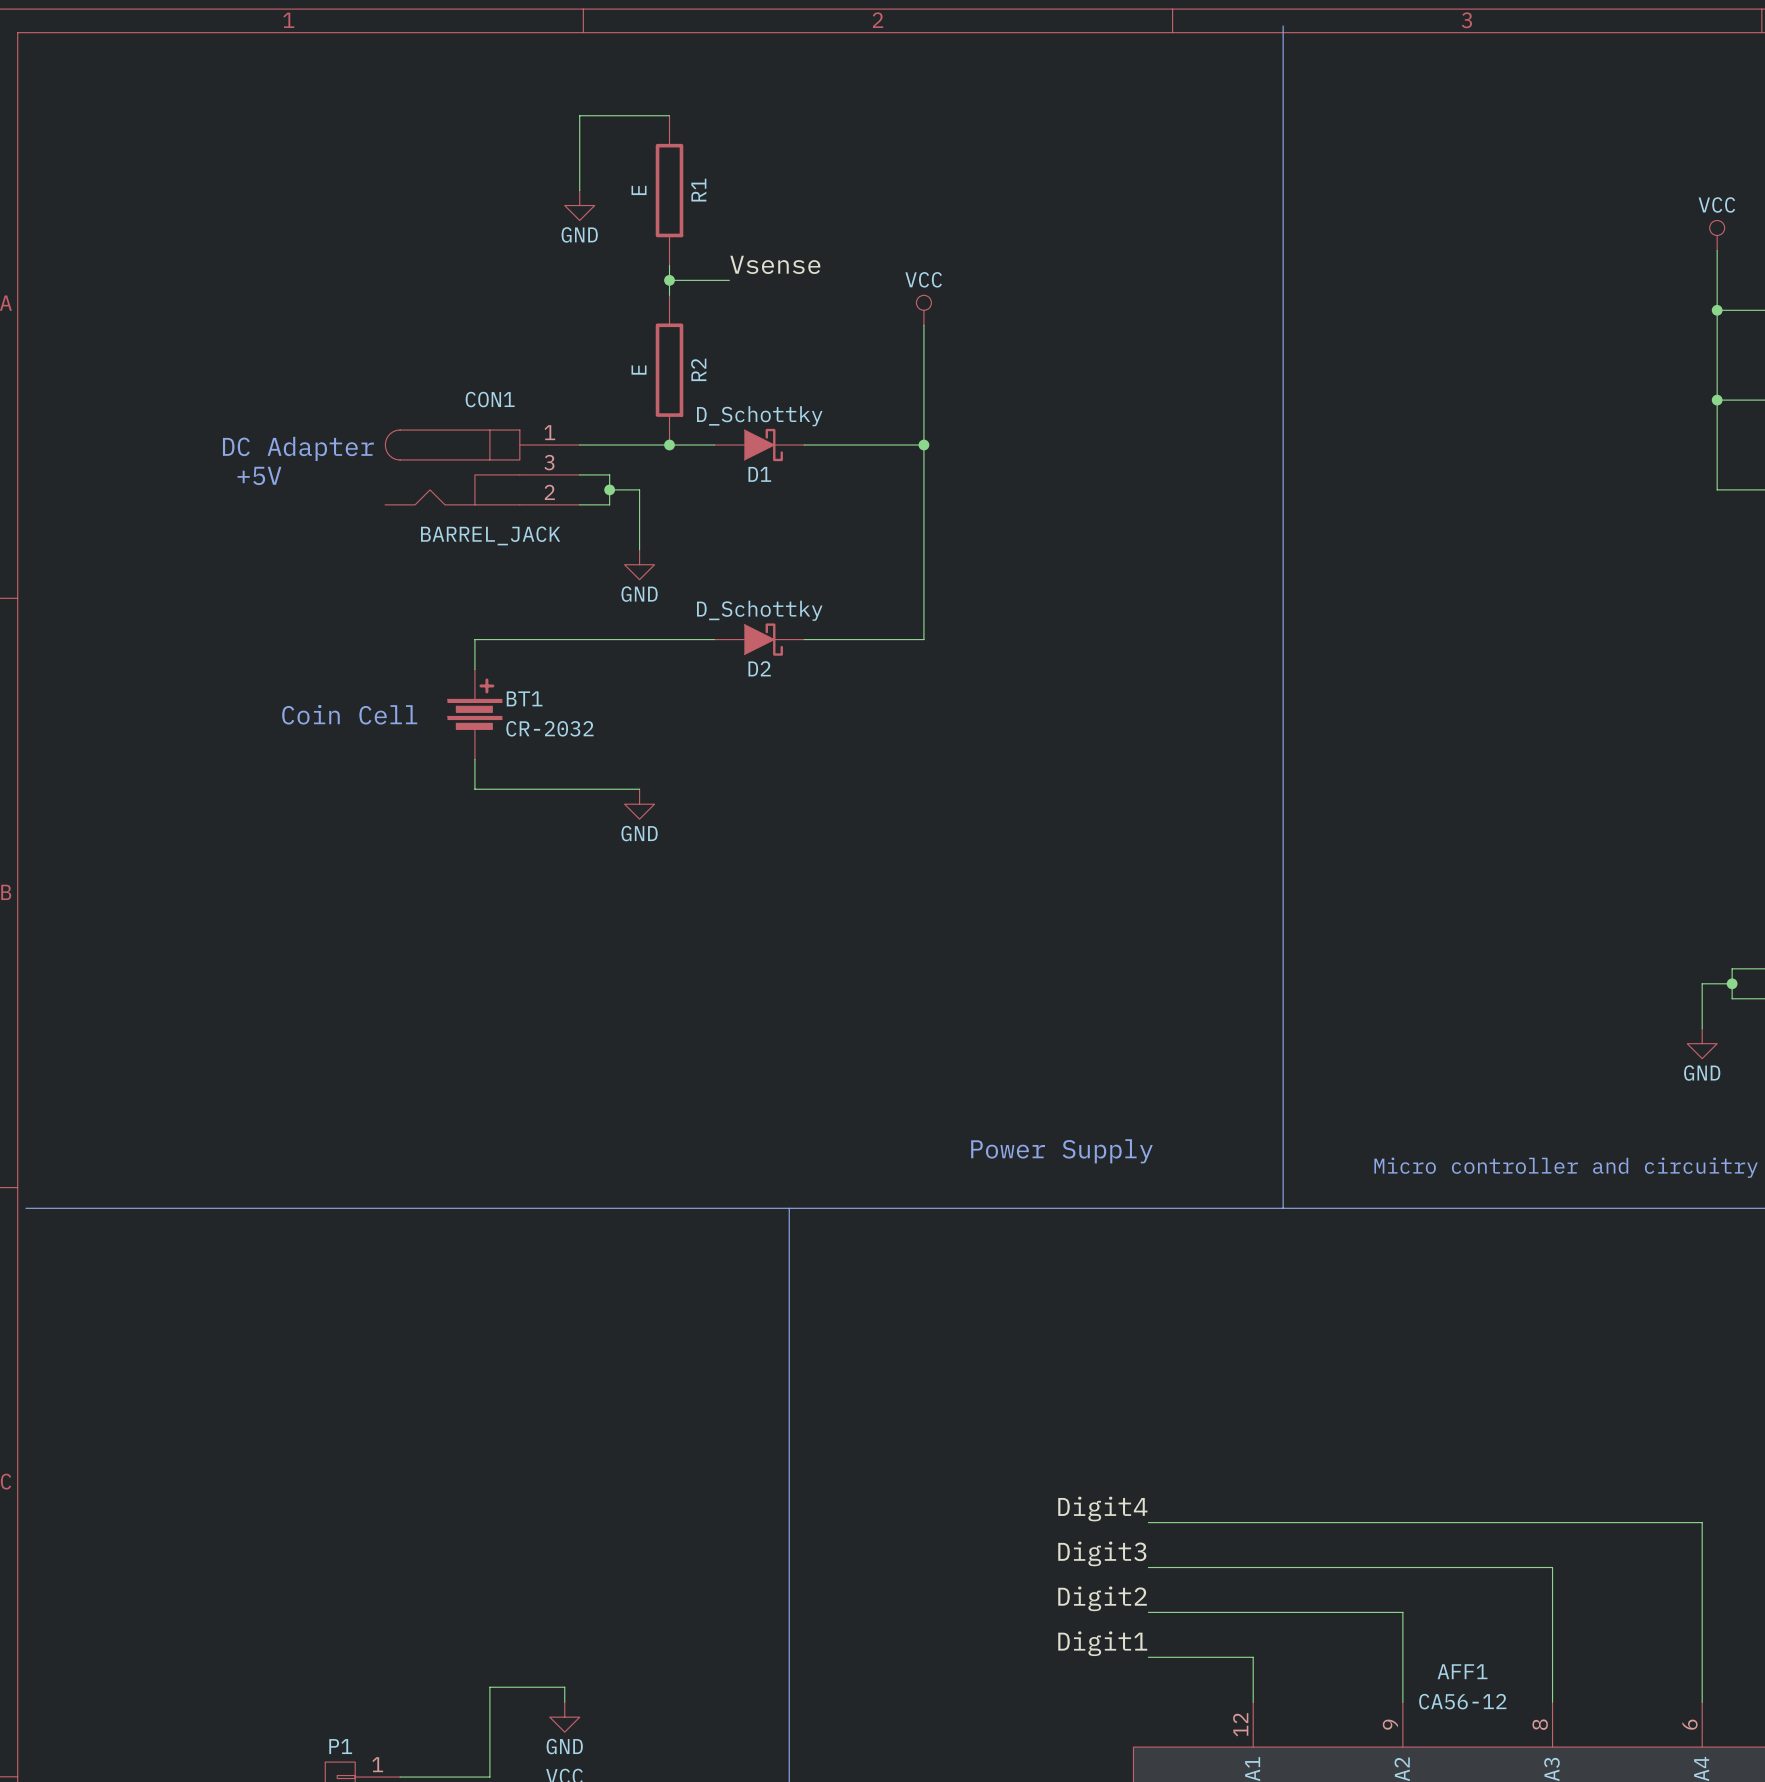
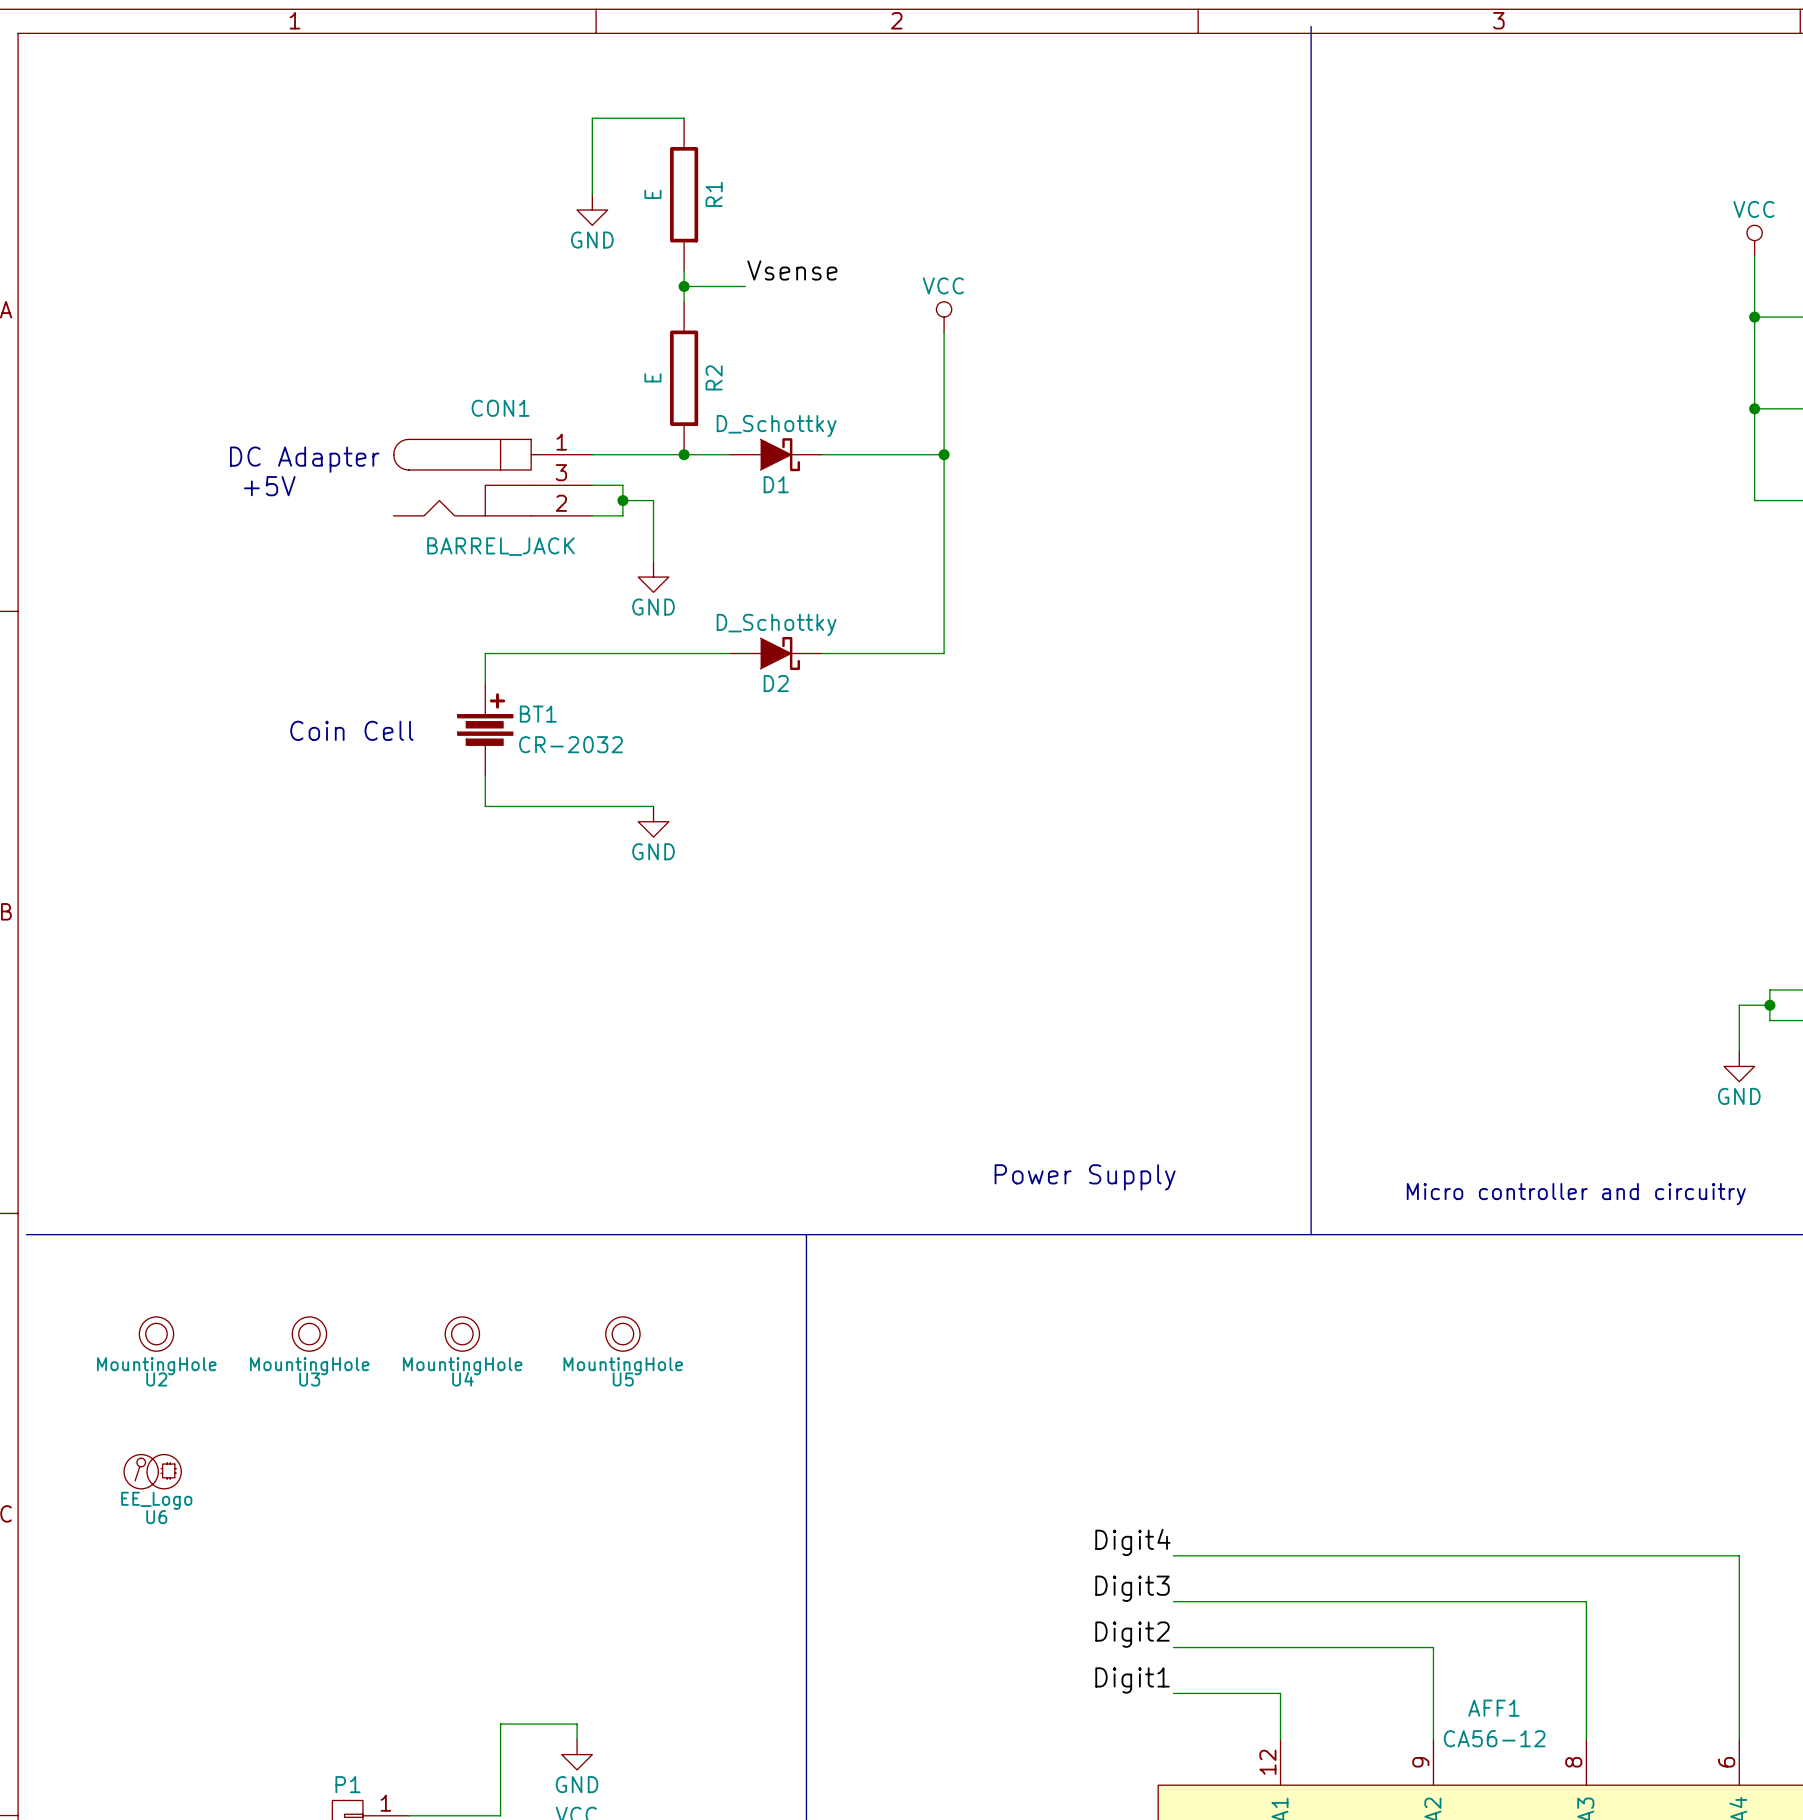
U2: none -> MountingHole (156, 1334)
U3: none -> MountingHole (309, 1334)
U4: none -> MountingHole (462, 1334)
U5: none -> MountingHole (622, 1334)
U6: none -> EE_Logo (152, 1471)

